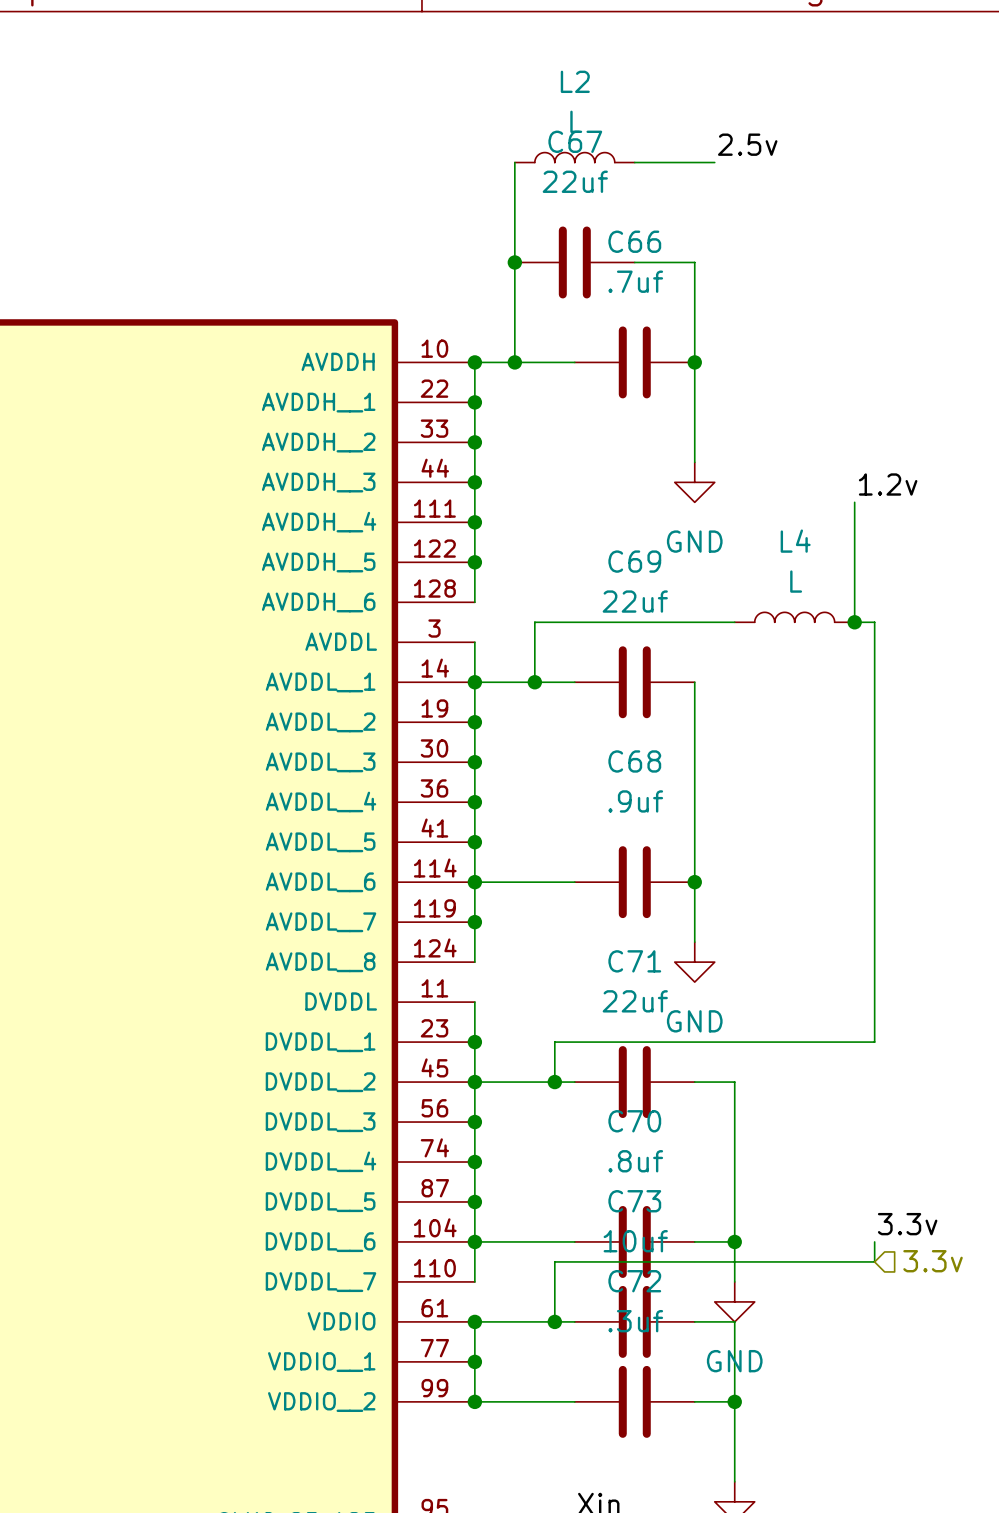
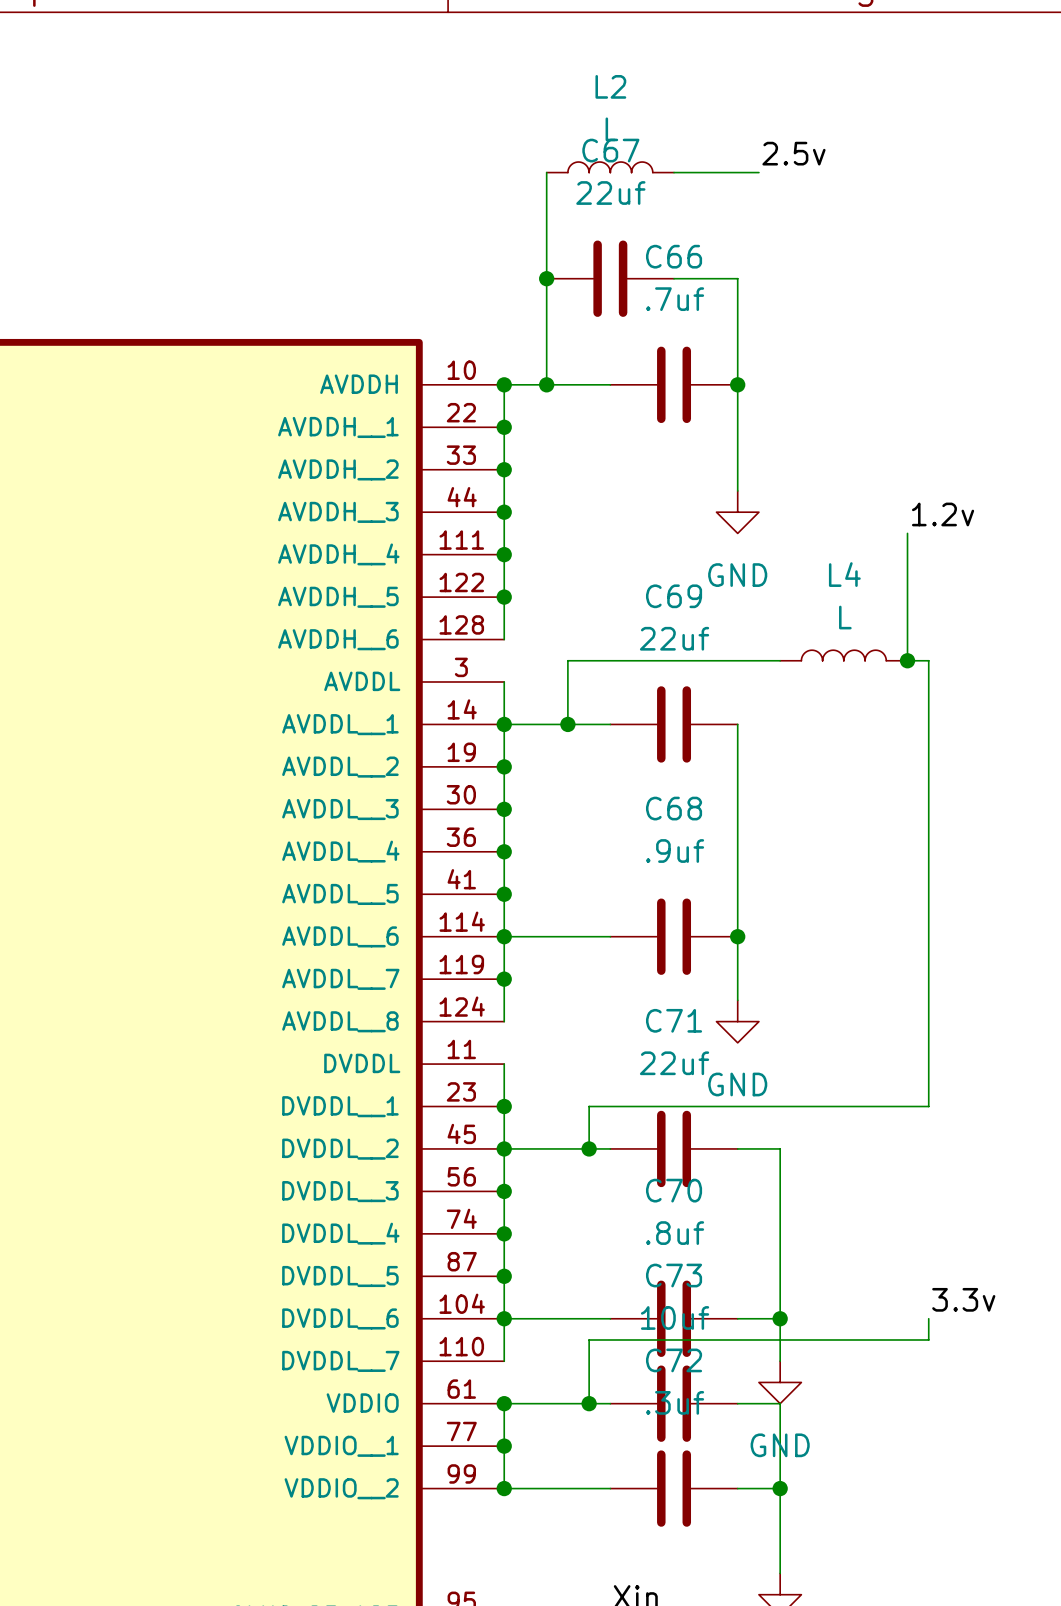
hierarchical label: 3.3v (933, 1261) -> none

